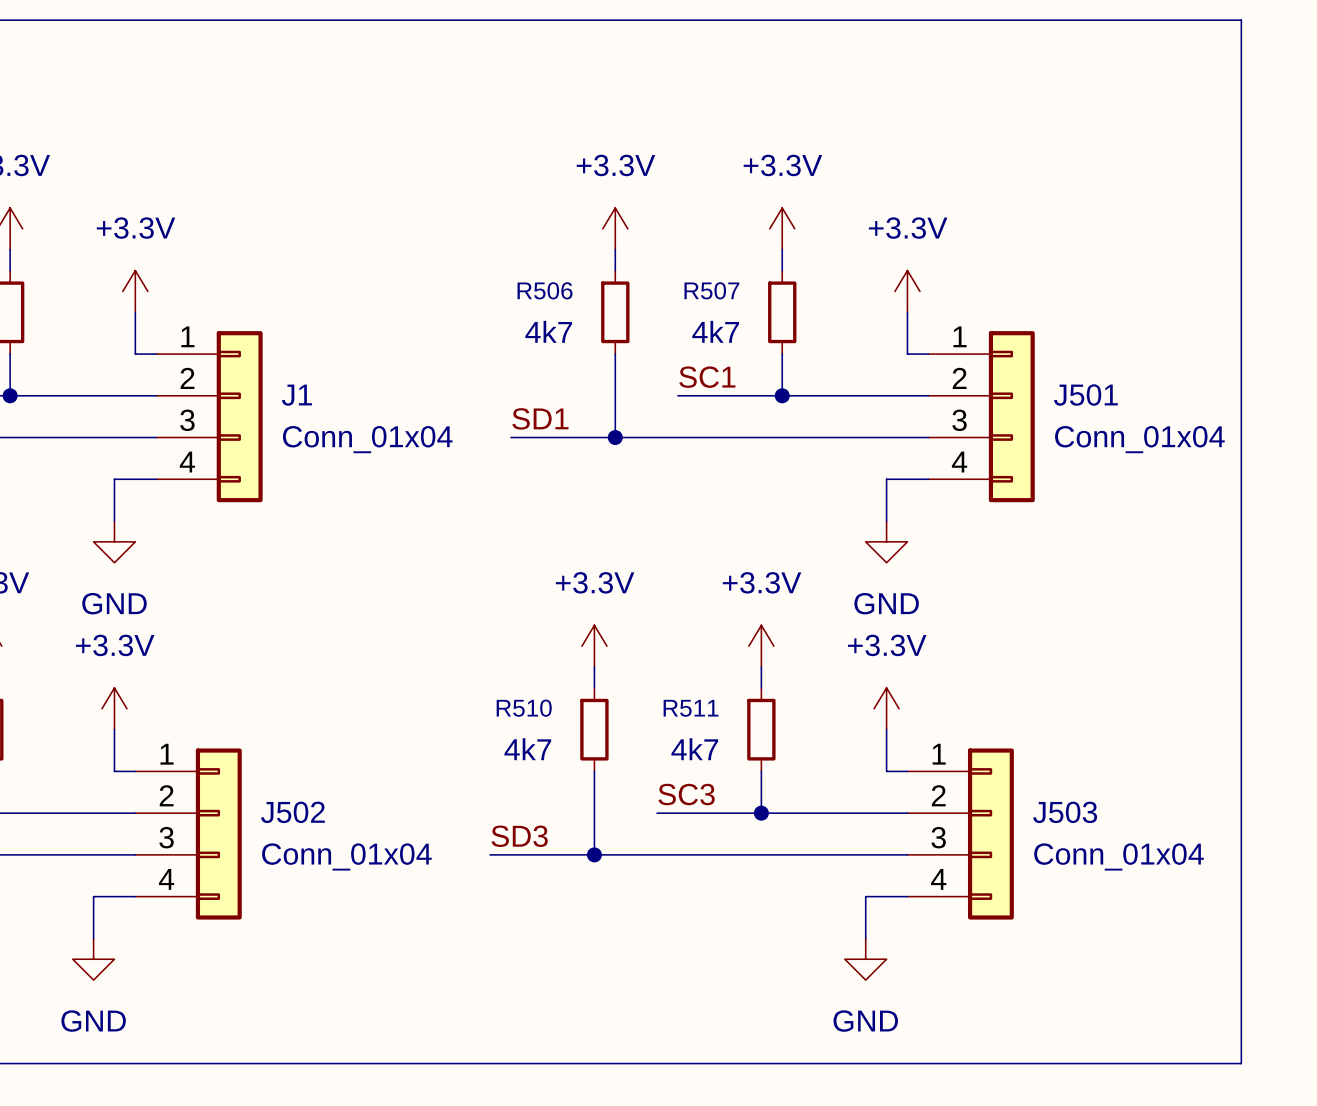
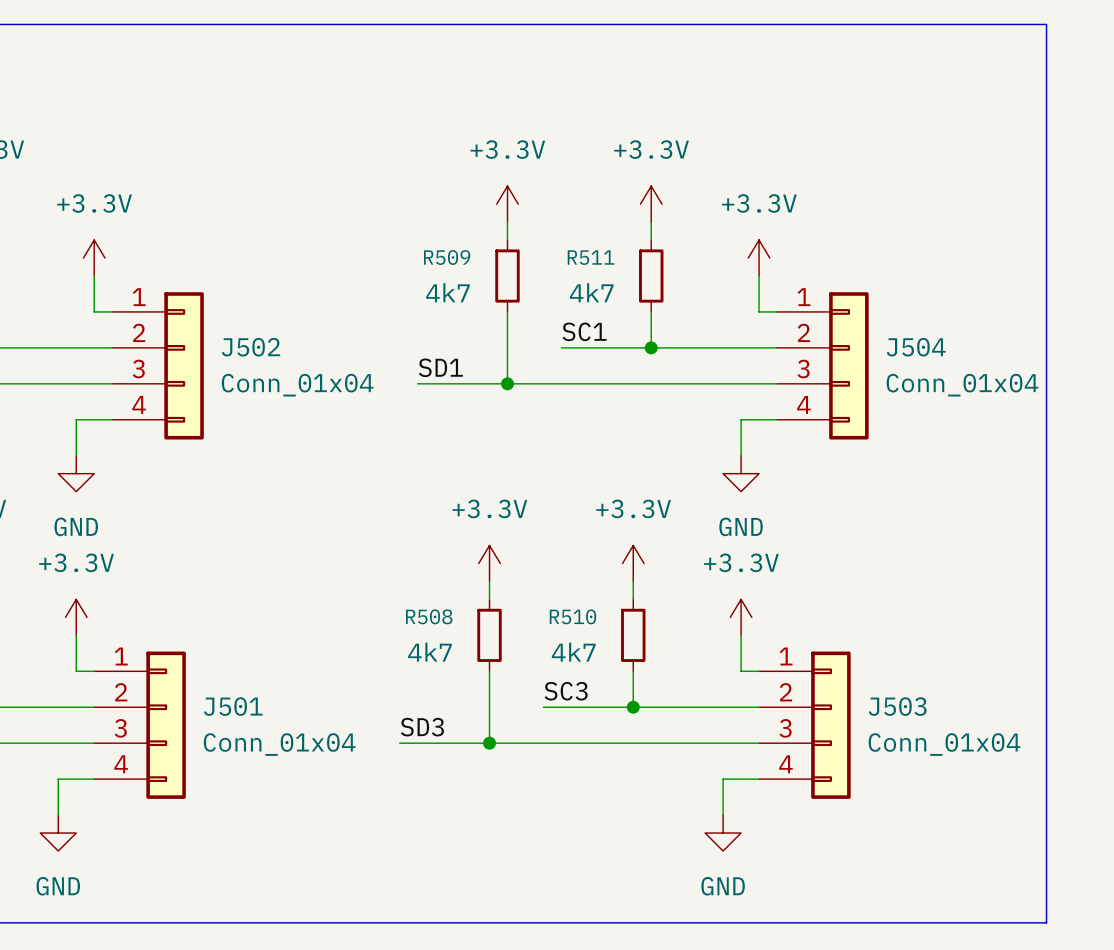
R506 name: R506 (545, 290) -> R509 (447, 257)
R507 name: R507 (711, 290) -> R511 (591, 257)
J1 name: J1 (296, 395) -> J502 (251, 347)
J501 name: J501 (1085, 395) -> J504 (916, 347)
R510 name: R510 (524, 708) -> R508 (429, 616)
R511 name: R511 (691, 708) -> R510 (572, 616)
J502 name: J502 (292, 812) -> J501 (233, 706)

